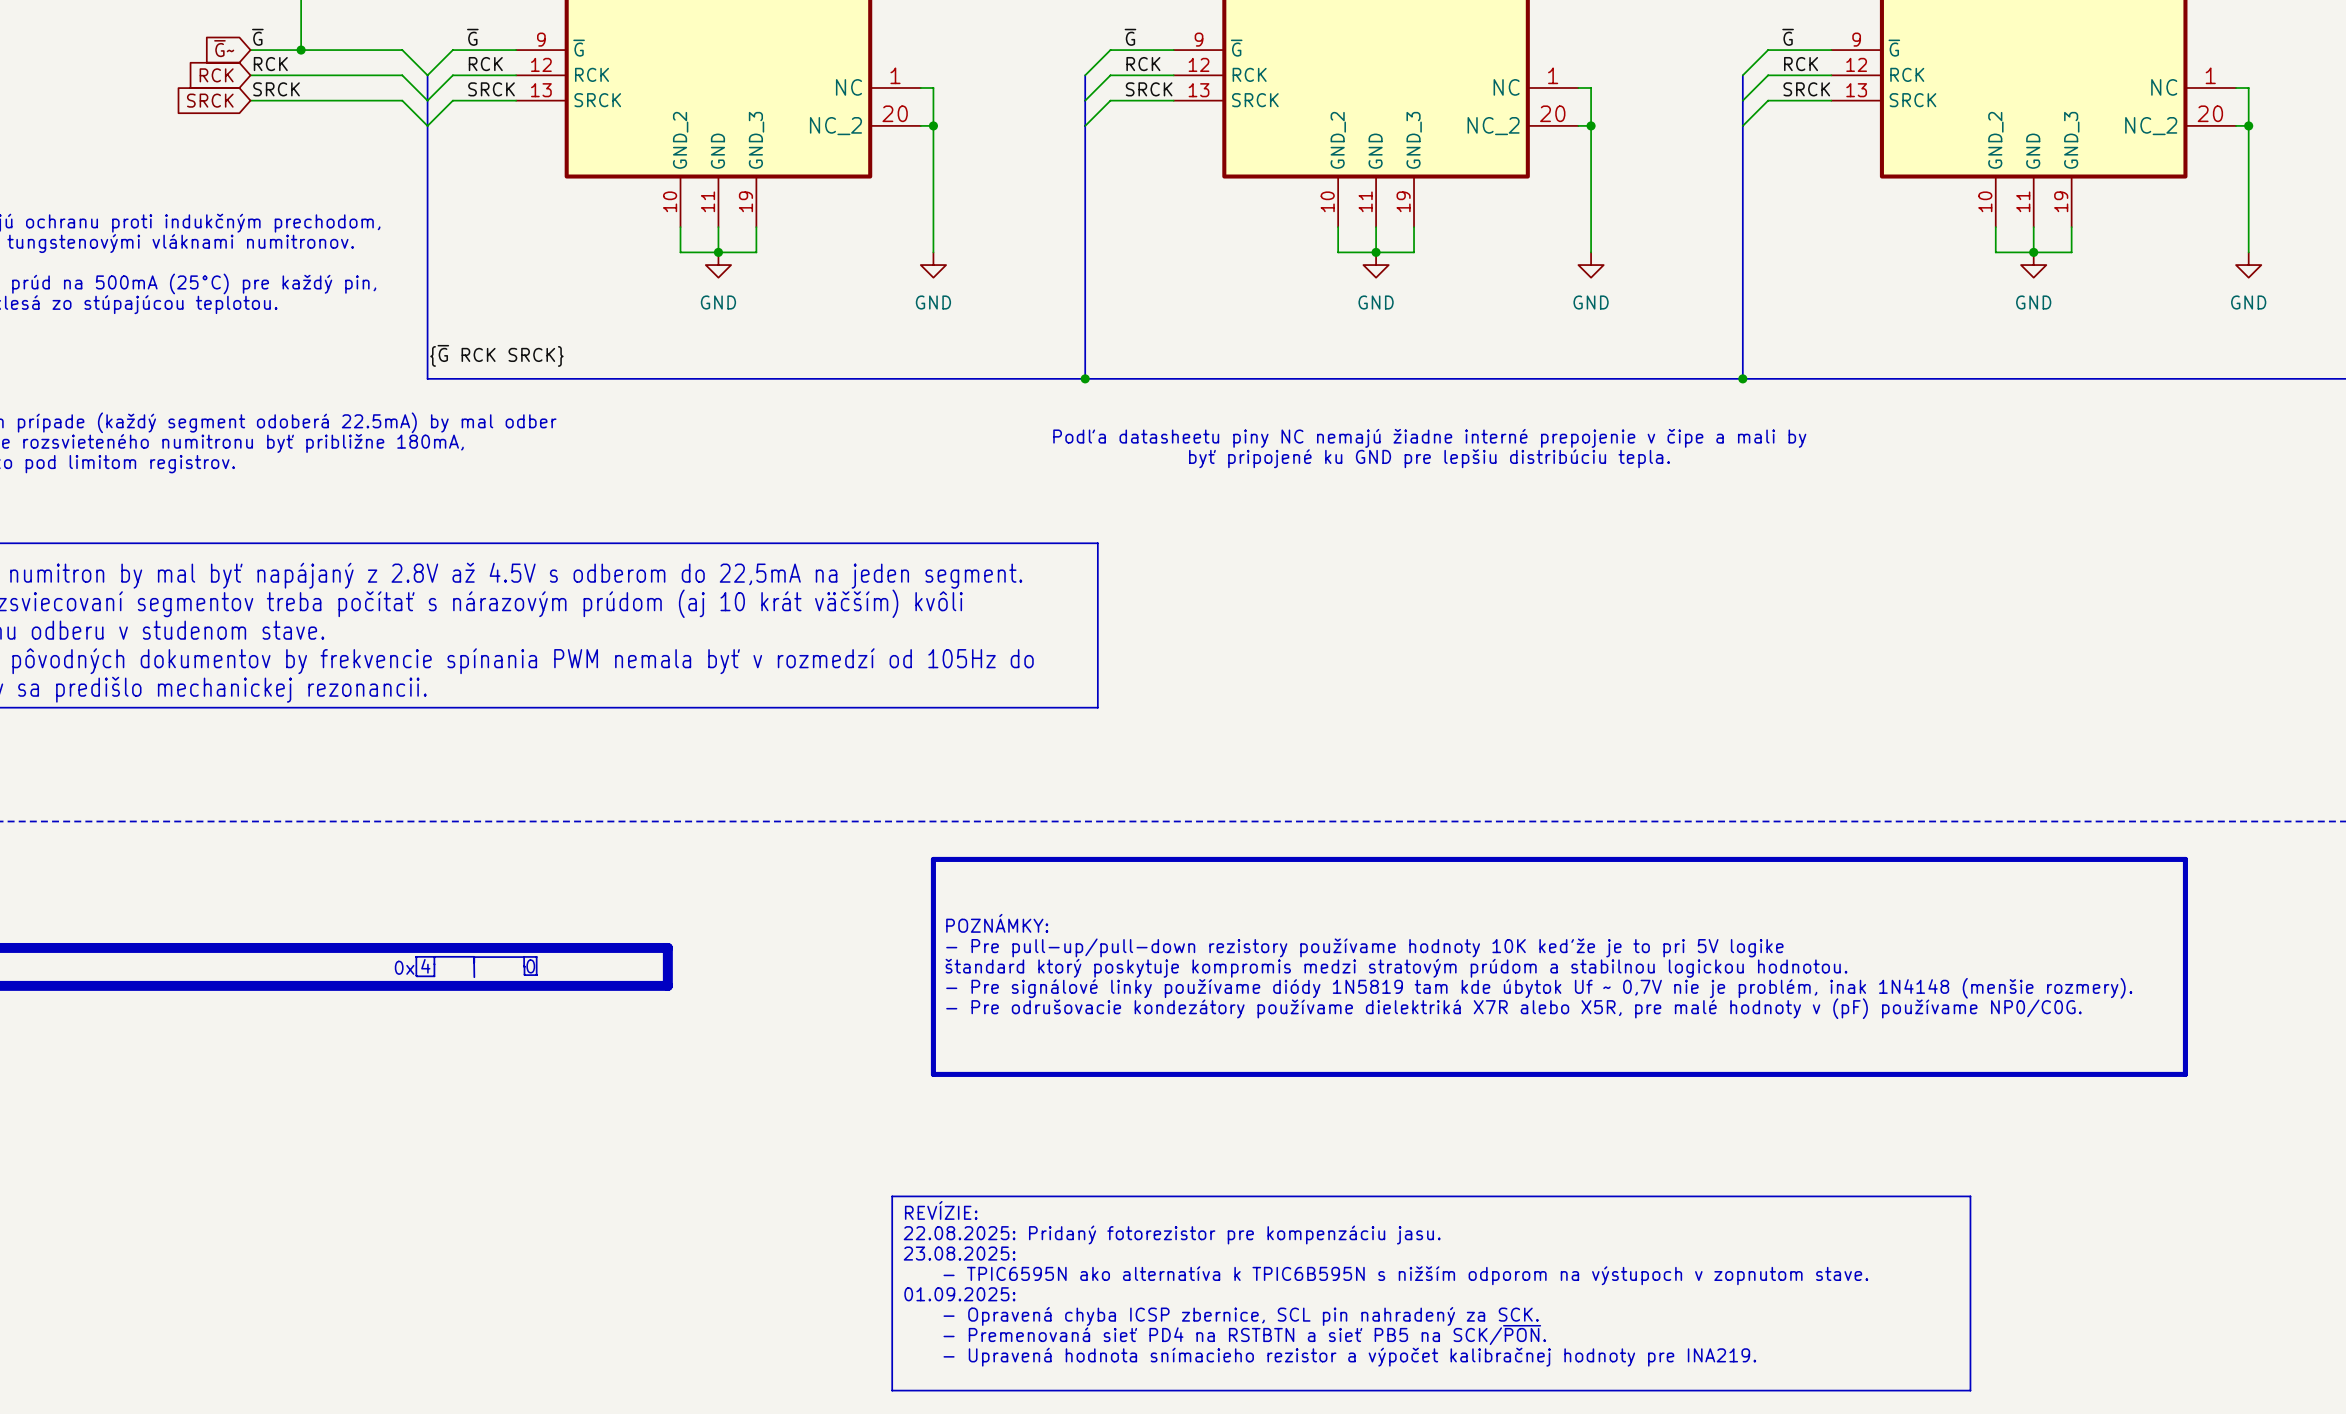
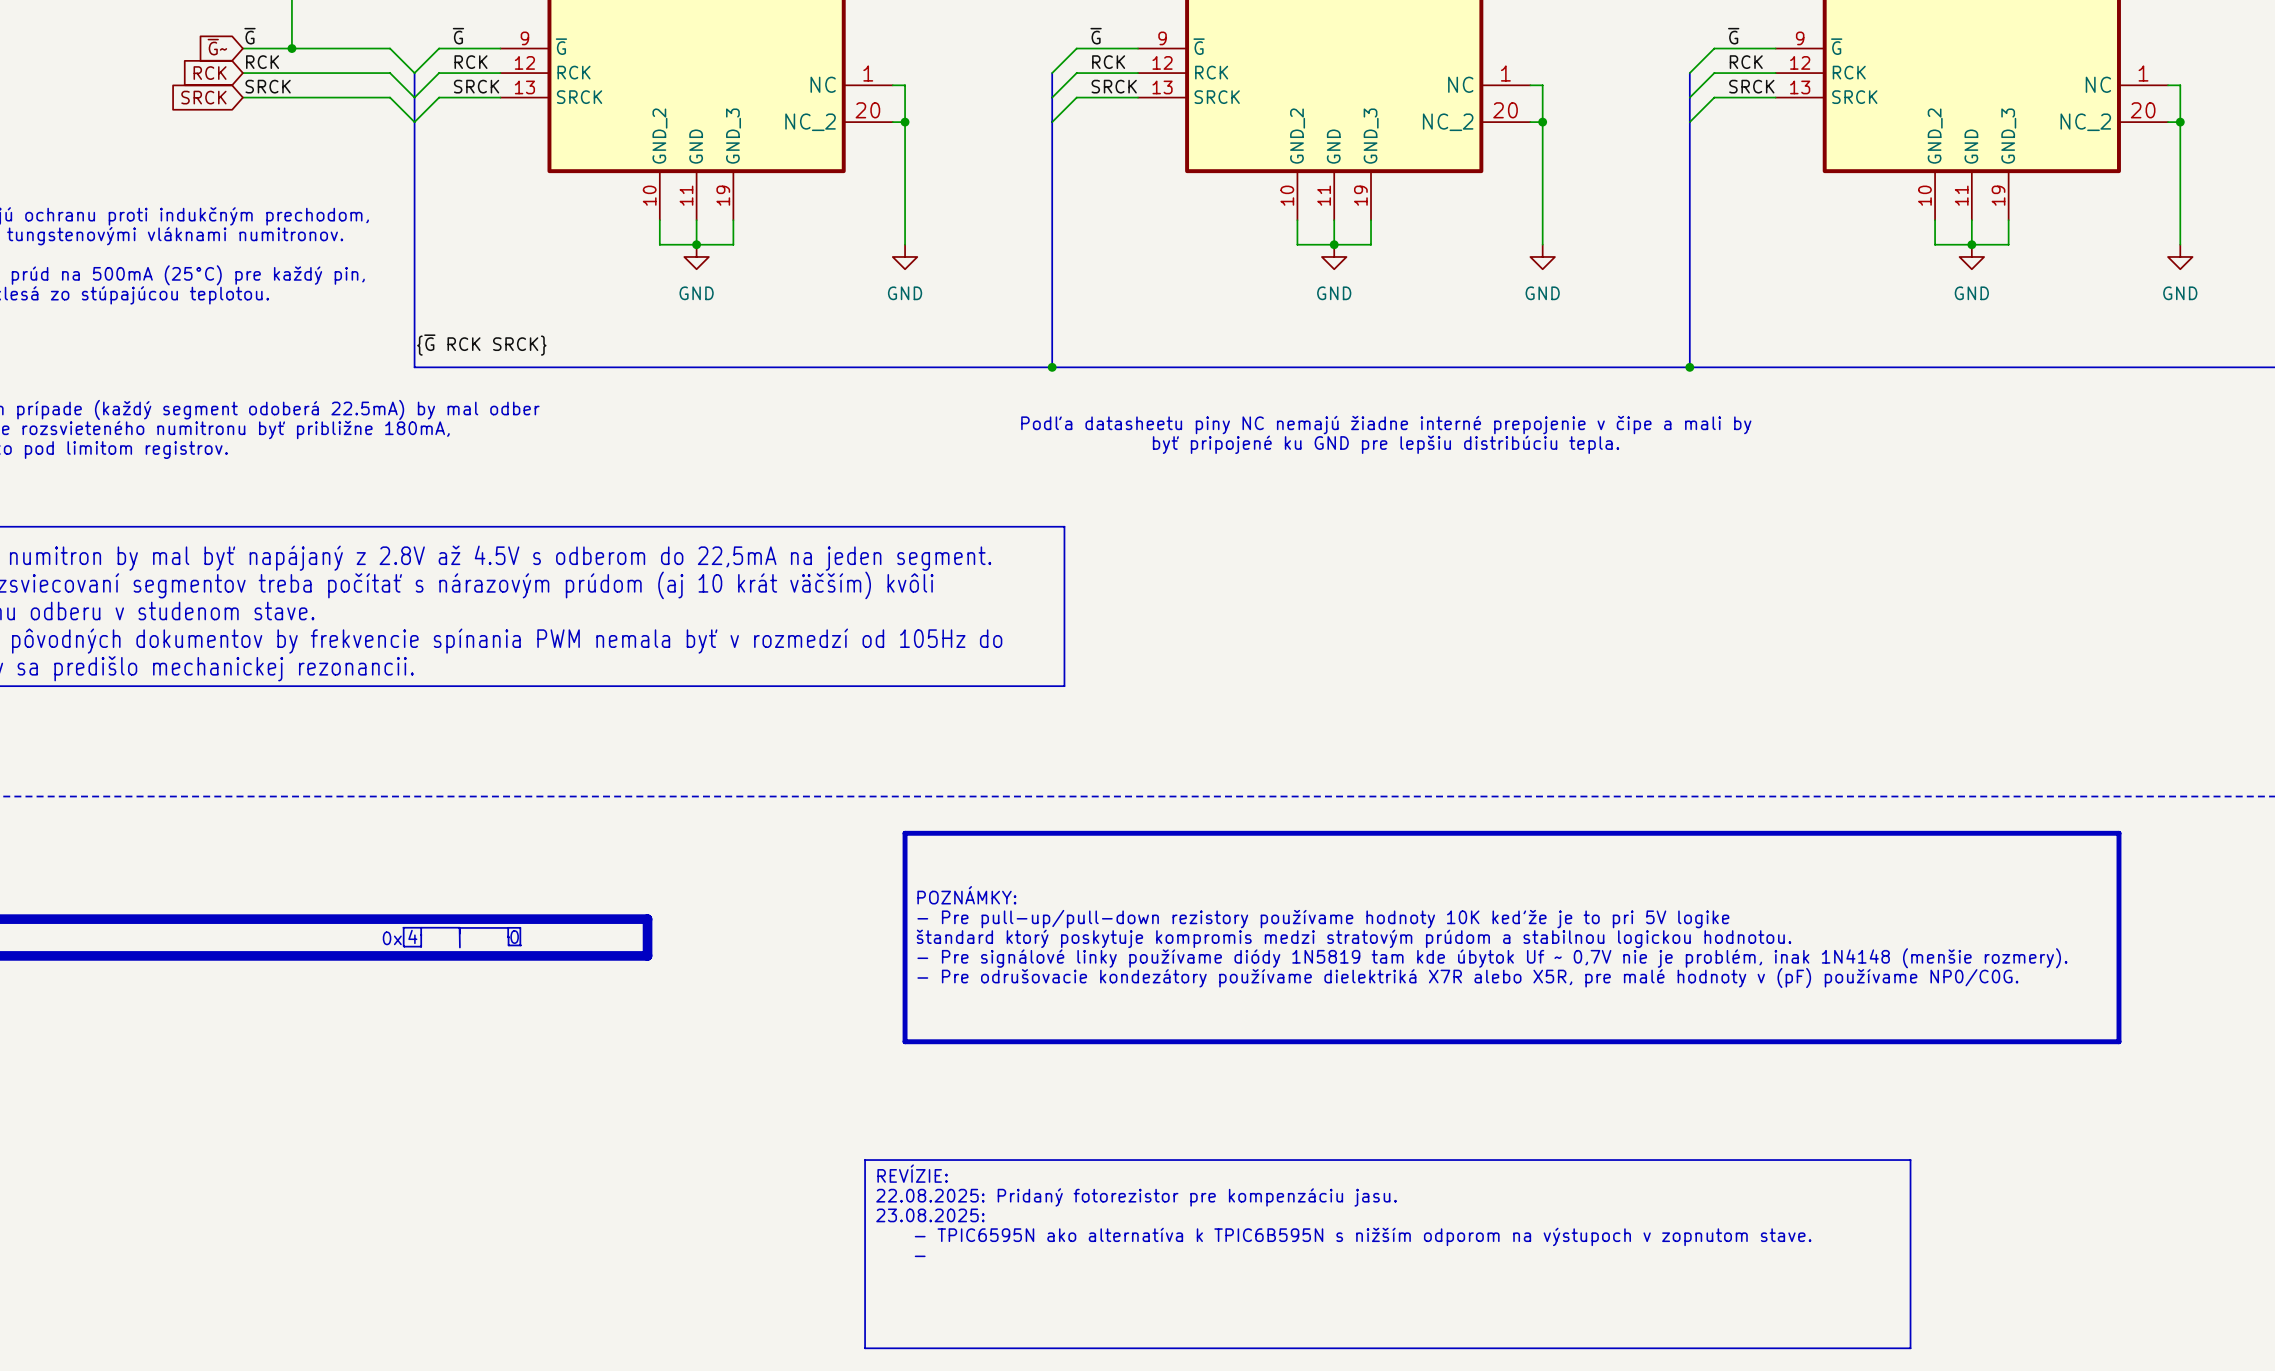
text: 01.09.2025: (959, 1294) -> - (920, 1256)
text: - Opravená chyba ICSP zbernice, SCL pin nahradený za SCK. (1241, 1316) -> none
text: - Premenovaná sieť PD4 na RSTBTN a sieť PB5 na SCK/~{PON}. (1244, 1335) -> none
text: - Upravená hodnota snímacieho rezistor a výpočet kalibračnej hodnoty pre INA219. (1349, 1357) -> none

